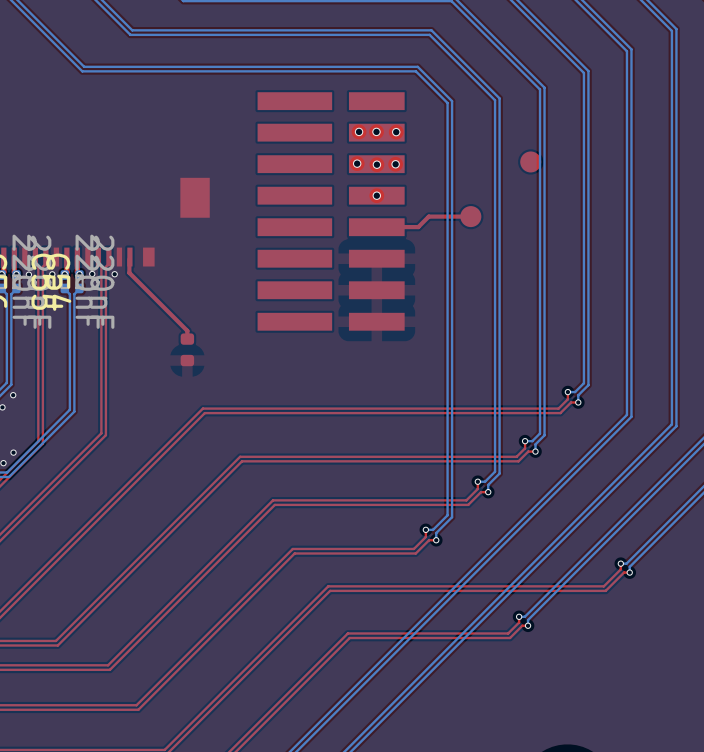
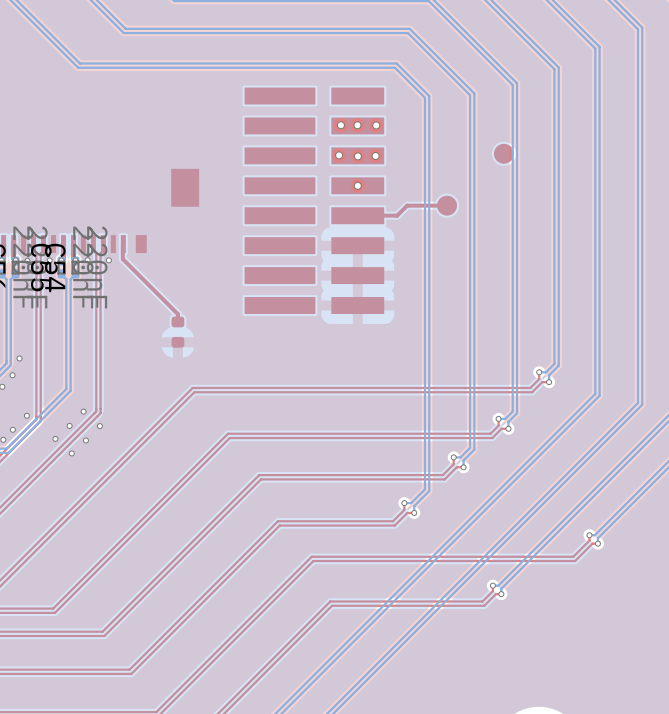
via: none -> (19, 358)
via: none -> (83, 411)
via: none -> (26, 415)
via: none -> (69, 425)
via: none -> (99, 426)
via: none -> (55, 438)
via: none -> (85, 440)
via: none -> (71, 453)

